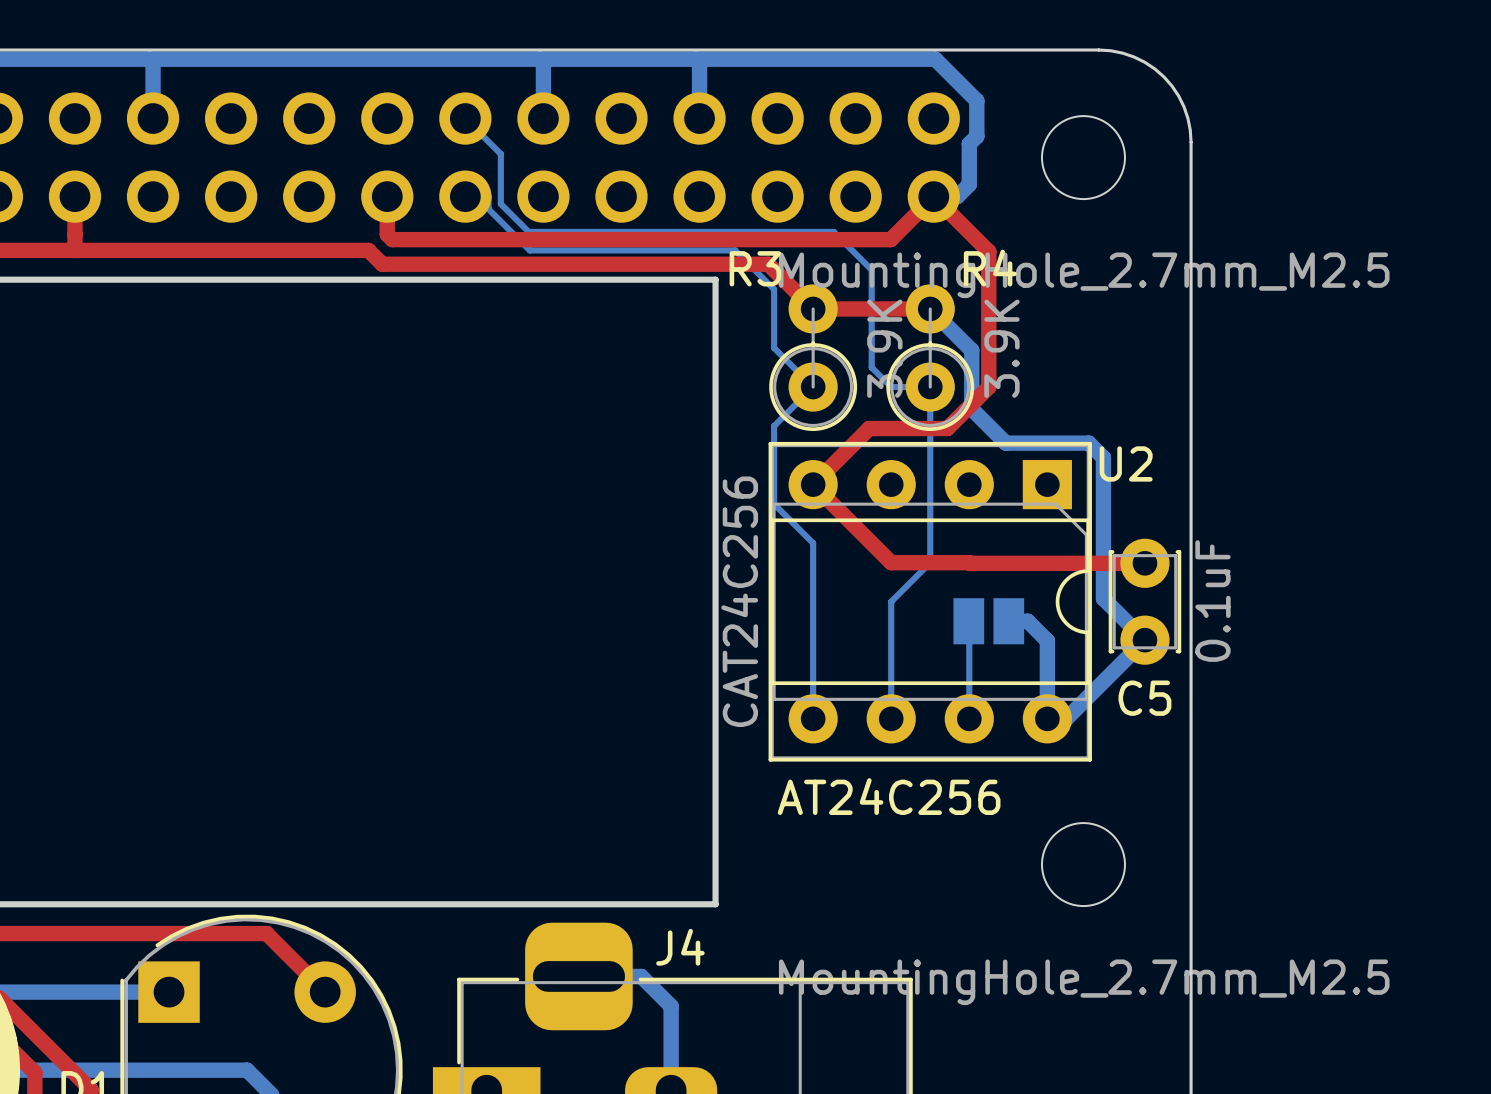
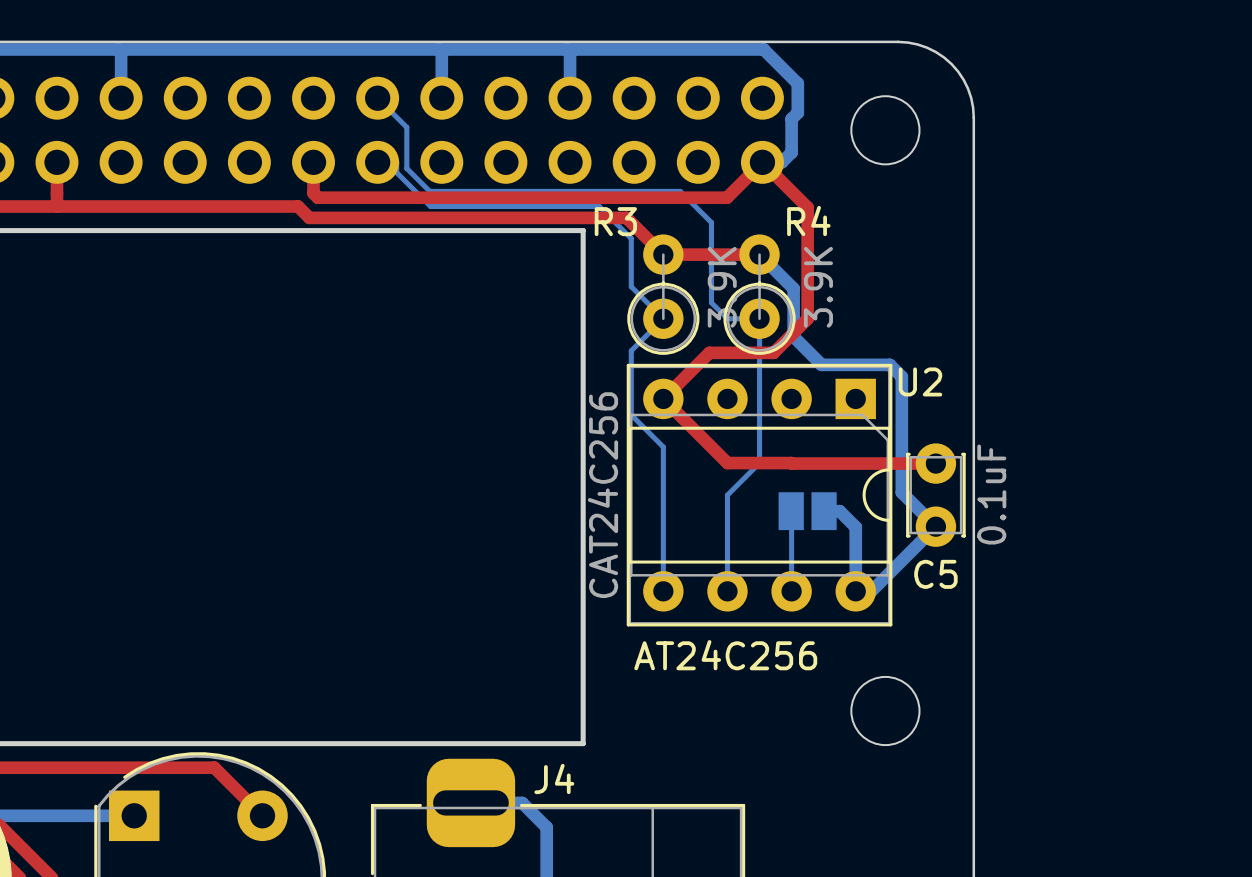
part value: MountingHole_2.7mm_M2.5 (1084, 275) -> none
part value: MountingHole_2.7mm_M2.5 (1084, 982) -> none

